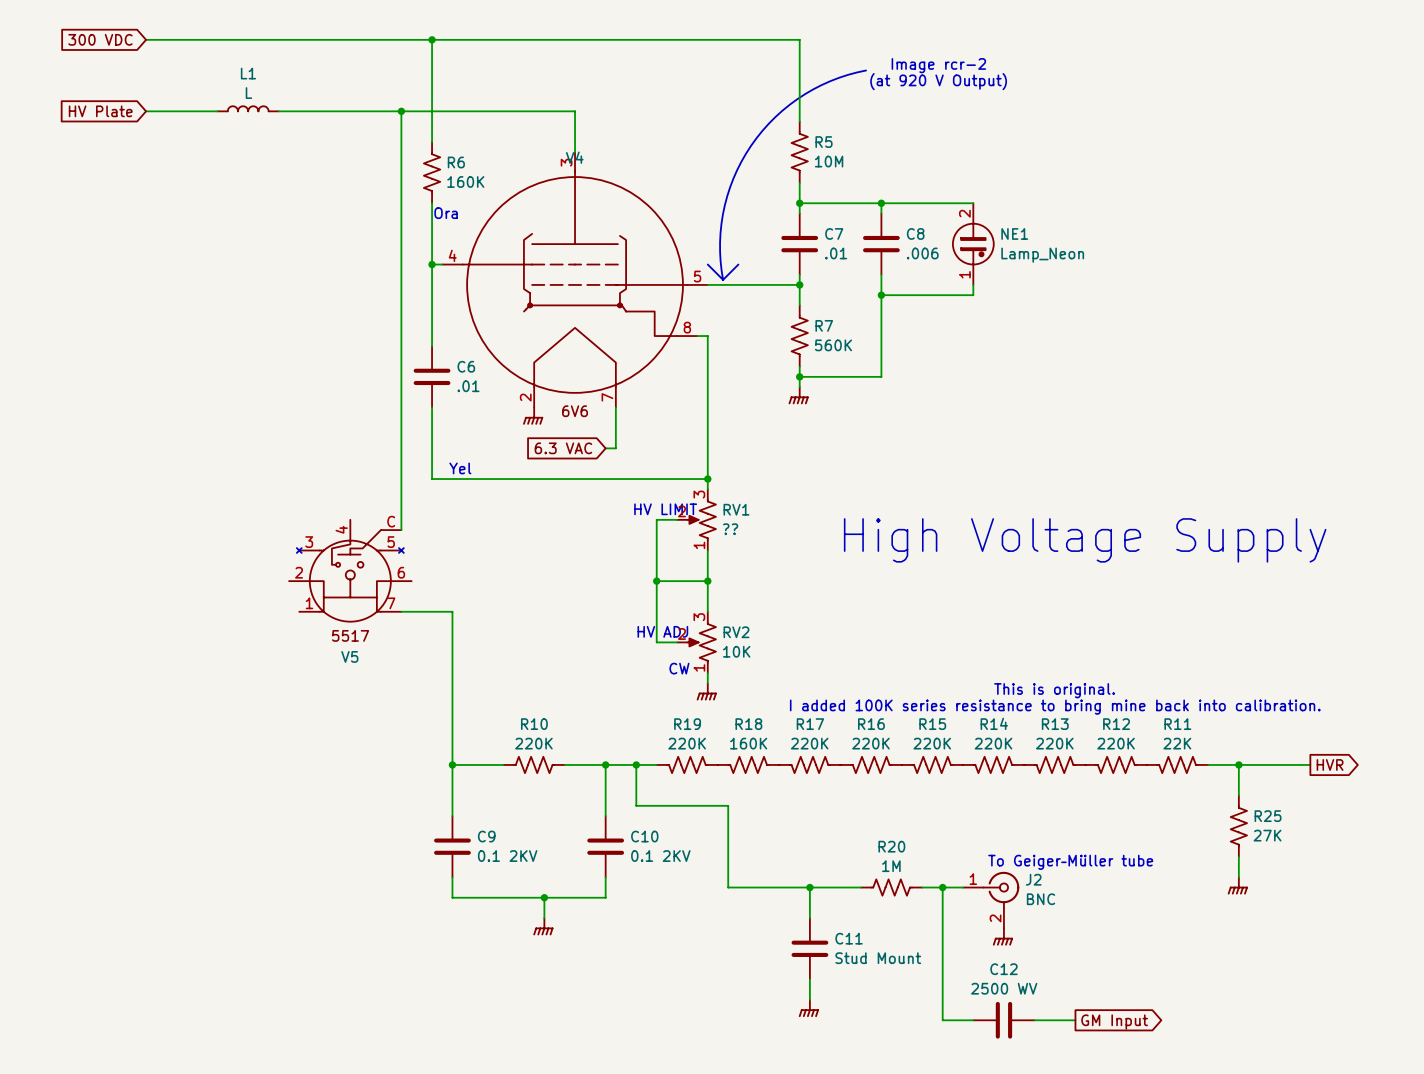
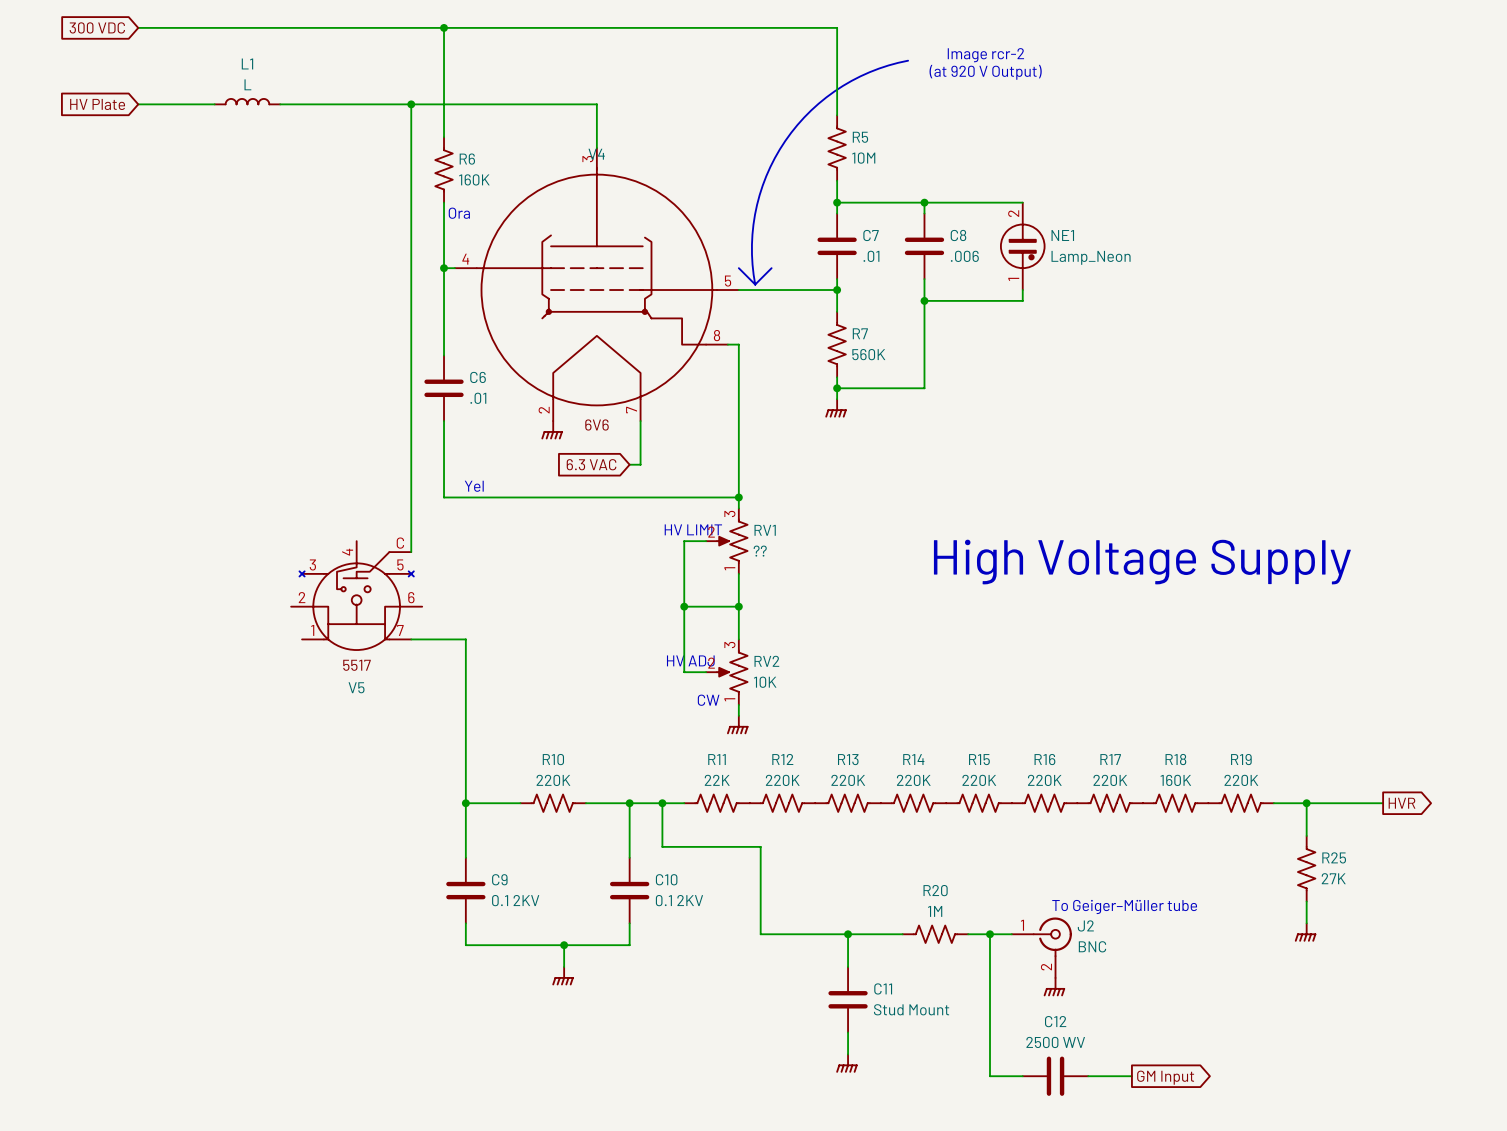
text: This is original. (1054, 690) -> none
text: I added 100K series resistance to bring mine back into calibration. (1055, 707) -> none
R19 flip: as is (687, 764) -> left-right (1241, 803)
R19 position: (687, 764) -> (1241, 803)
R18 flip: as is (748, 764) -> left-right (1175, 803)
R18 position: (748, 764) -> (1175, 803)
R17 flip: as is (809, 764) -> left-right (1110, 803)
R17 position: (809, 764) -> (1110, 803)
R16 flip: as is (871, 764) -> left-right (1044, 803)
R16 position: (871, 764) -> (1044, 803)
R15 flip: as is (932, 764) -> left-right (979, 803)
R14 flip: as is (993, 764) -> left-right (913, 803)
R14 position: (993, 764) -> (913, 803)
R13 flip: as is (1055, 764) -> left-right (848, 803)
R13 position: (1055, 764) -> (848, 803)
R12 flip: as is (1116, 764) -> left-right (782, 803)
R12 position: (1116, 764) -> (782, 803)
R11 flip: as is (1177, 764) -> left-right (717, 803)
R11 position: (1177, 764) -> (717, 803)

